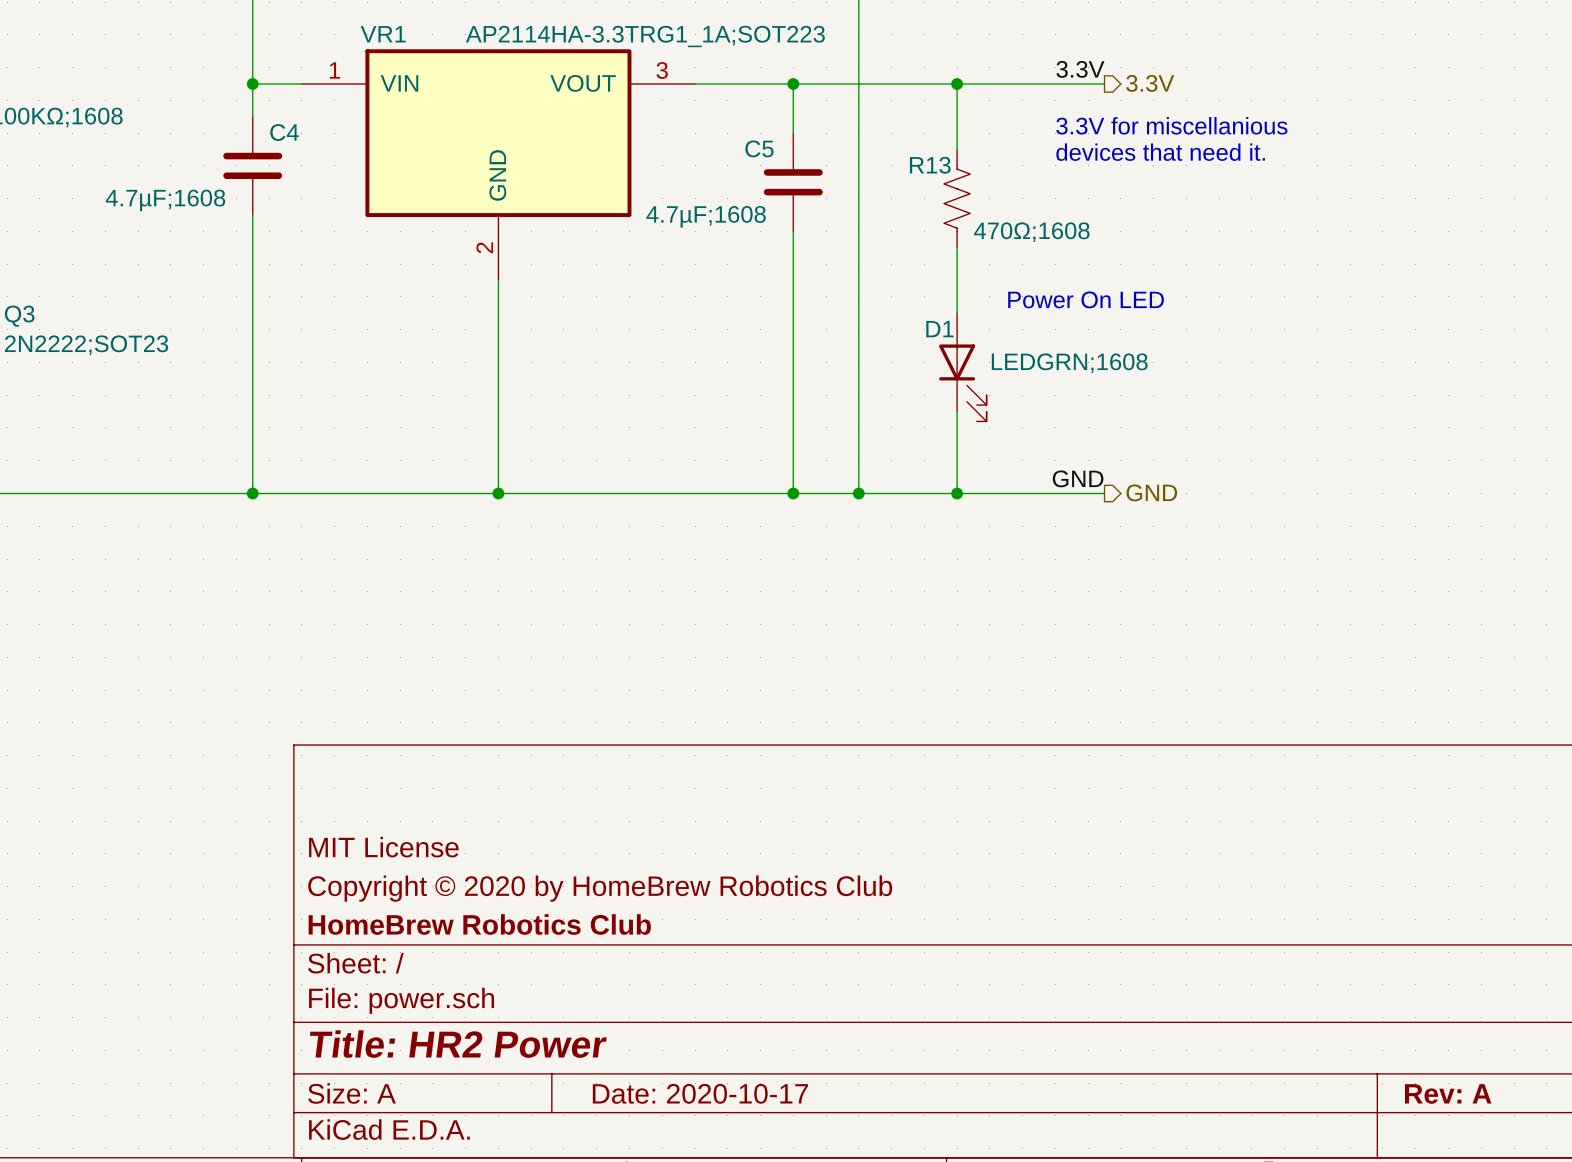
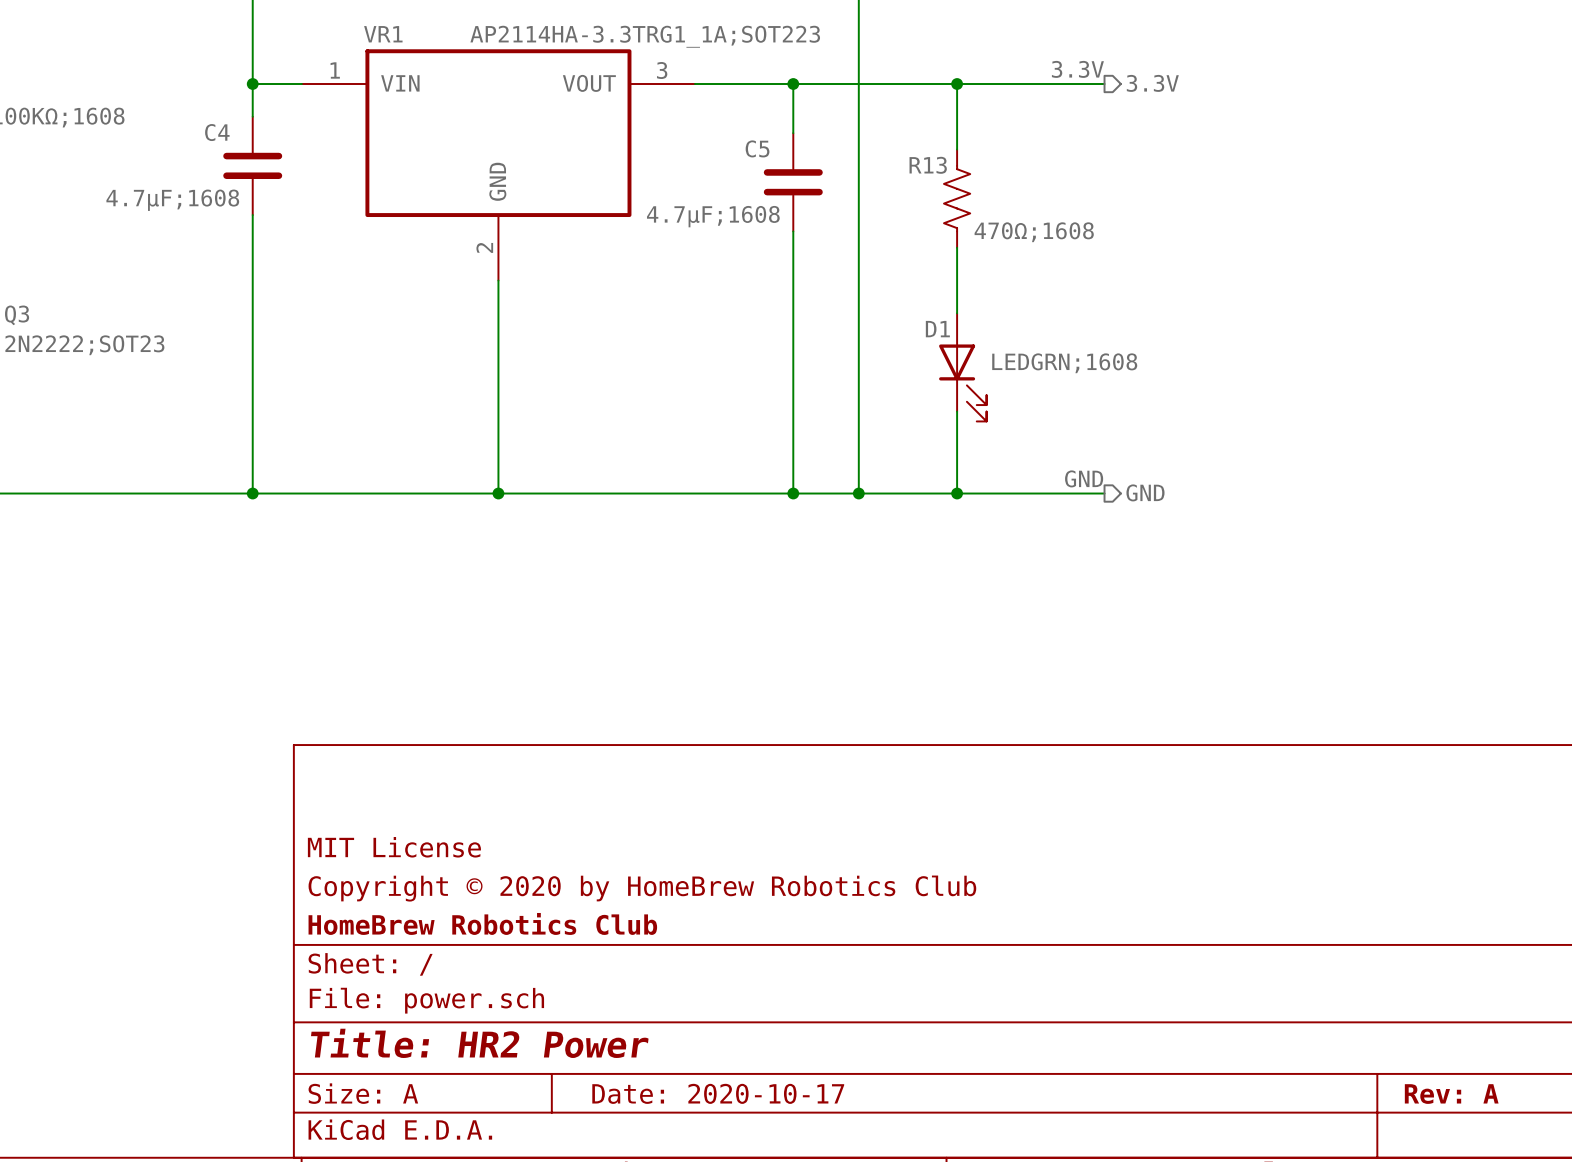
text: 3.3V for miscellanious (1171, 125) -> none
C4 name position: C4 (284, 132) -> C4 (217, 132)
text: devices that need it. (1160, 152) -> none
text: Power On LED (1086, 299) -> none

